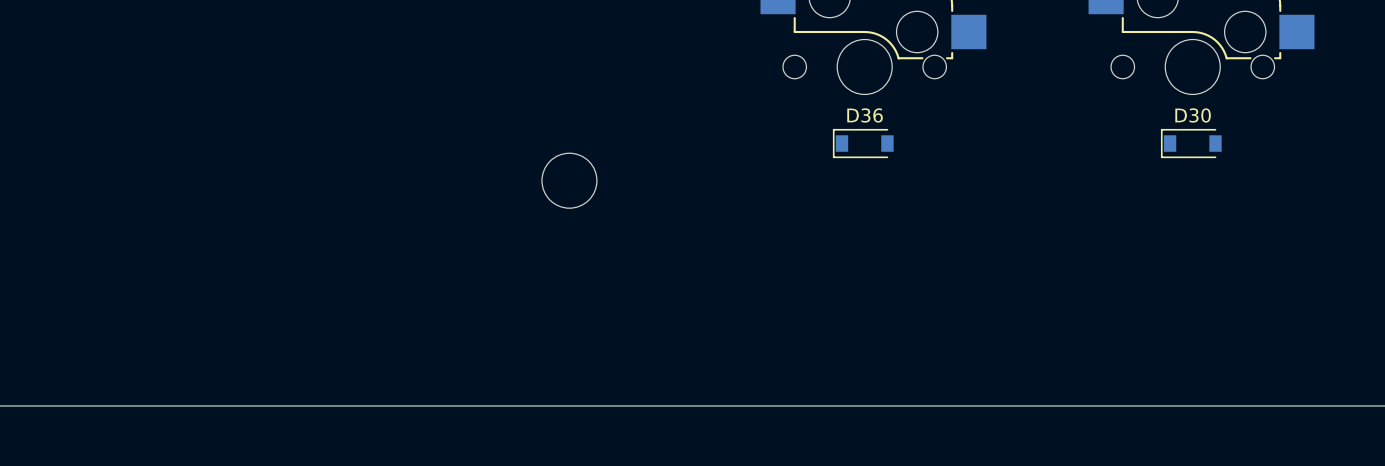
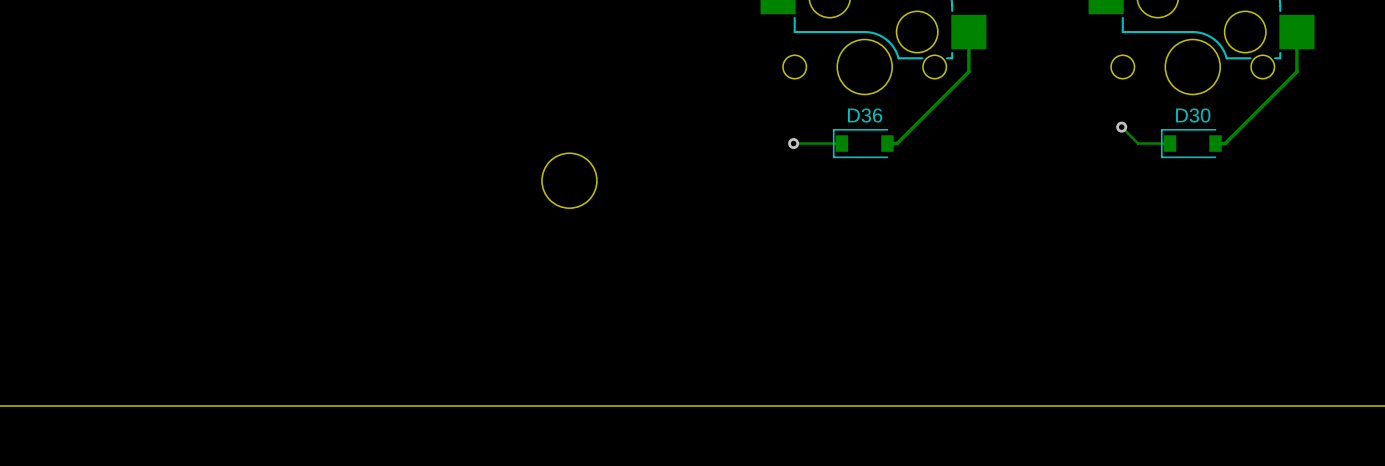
track: none -> (968, 31) (968, 71) (897, 143) (887, 143)
track: none -> (1296, 31) (1296, 71) (1225, 143) (1215, 143)
track: none -> (1121, 127) (1138, 143) (1170, 143)
via: none -> (1121, 127)
via: none -> (793, 143)
track: none -> (841, 143) (793, 143)

